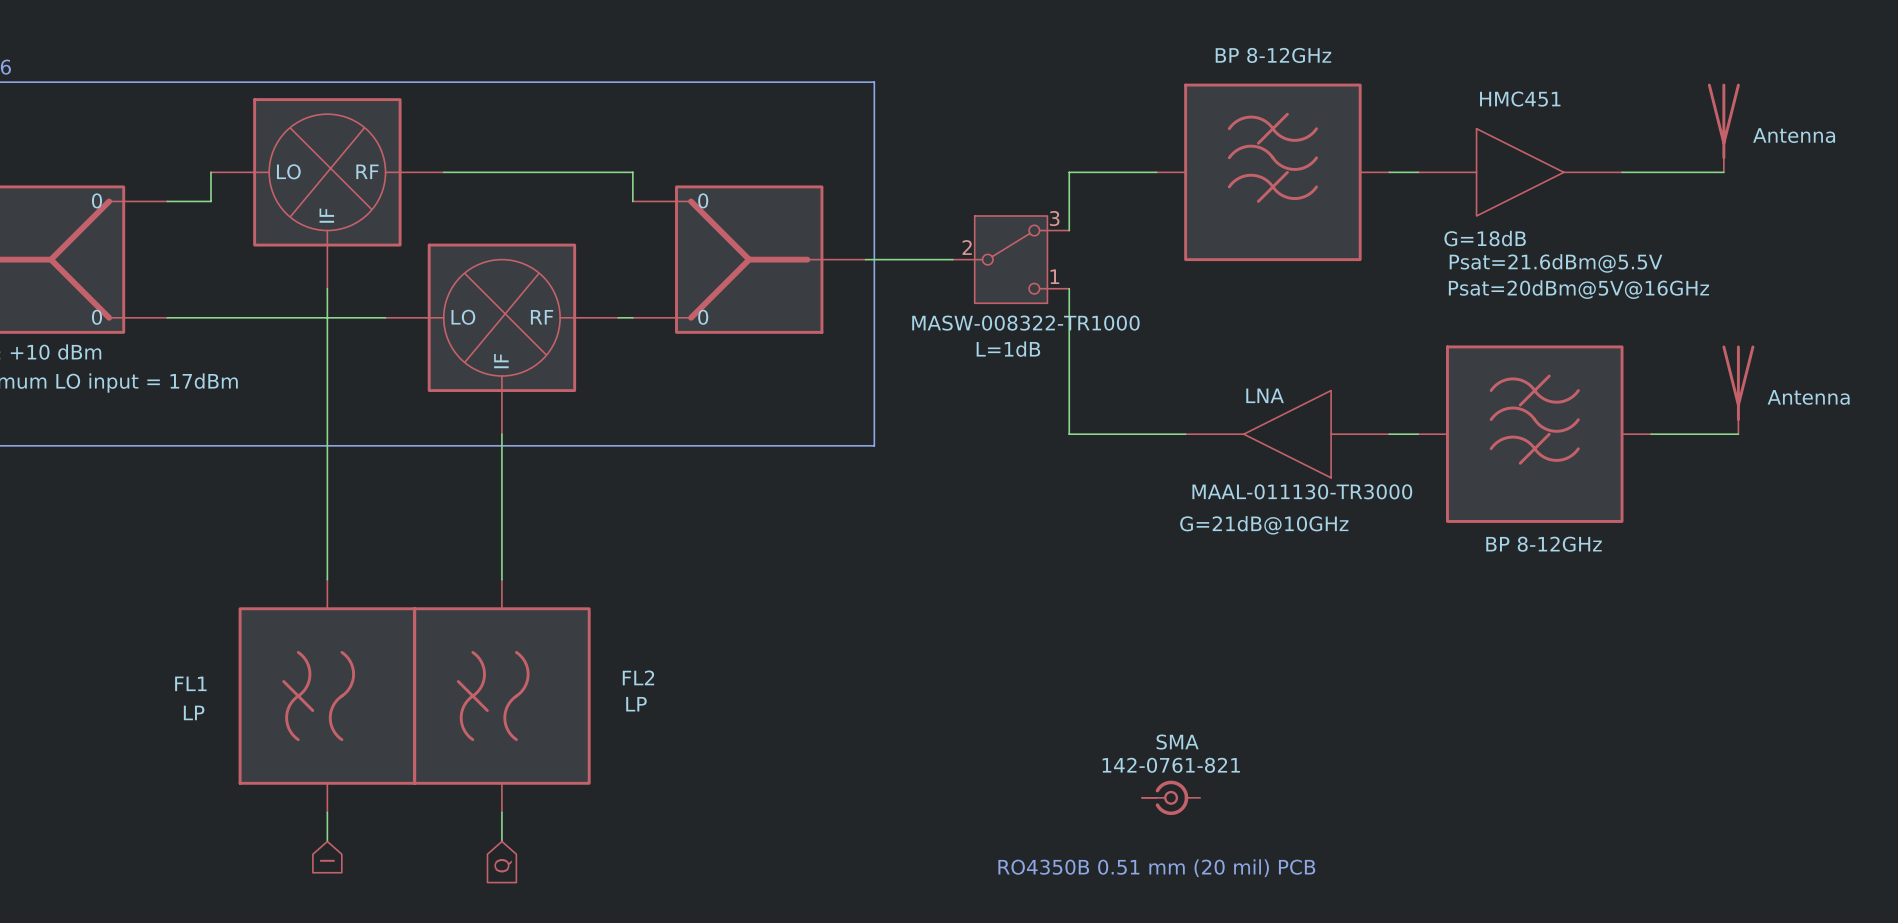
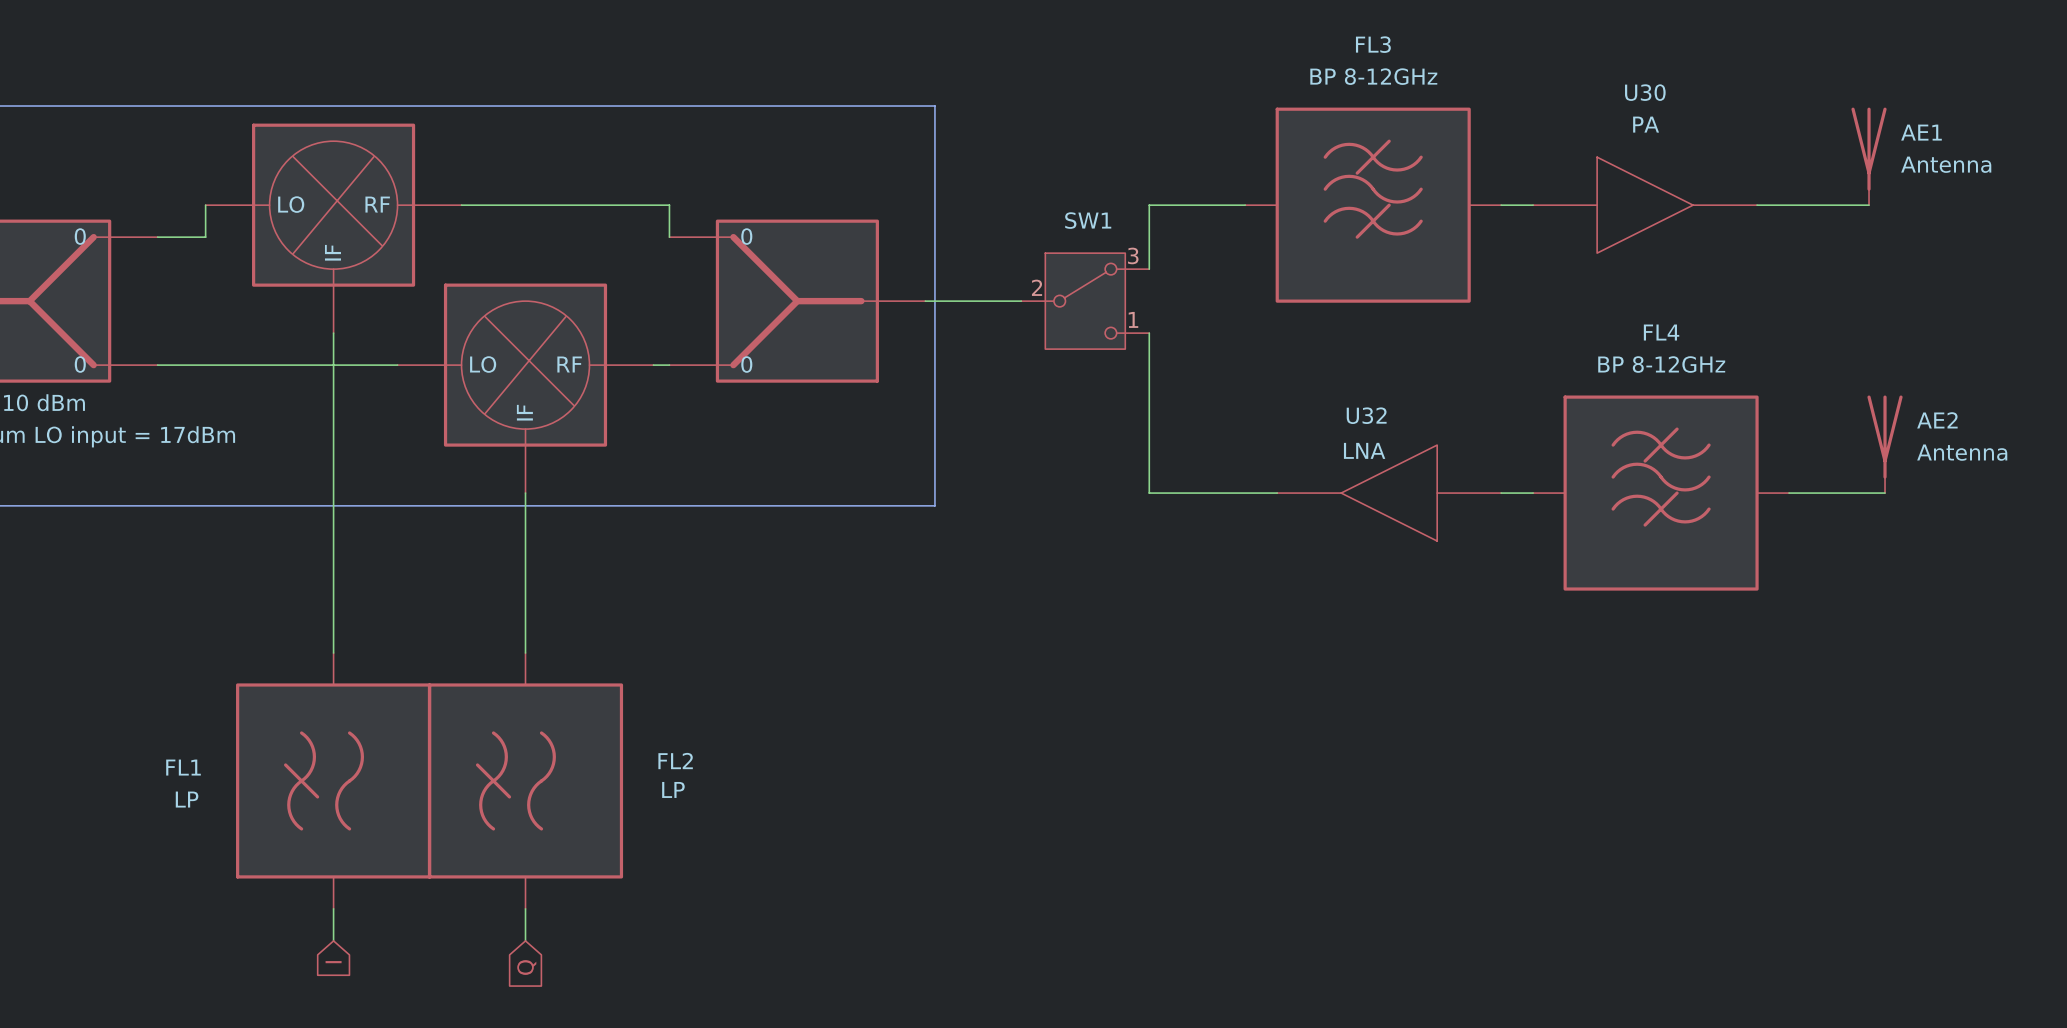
FL3 name: none -> FL3 (1373, 44)
U30 name: none -> U30 (1645, 92)
U30 value: HMC451 (1520, 99) -> PA (1646, 124)
AE1 name: none -> AE1 (1921, 132)
SW1 name: none -> SW1 (1088, 220)
U30 text: G=18dB (1485, 238) -> none
U30 text: Psat=21.6dBm@5.5V (1556, 263) -> none
FL4 name: none -> FL4 (1661, 332)
U30 text: Psat=20dBm@5V@16GHz (1578, 289) -> none
SW1 text: MASW-008322-TR1000 (1025, 323) -> none
SW1 text: L=1dB (1008, 349) -> none
U32 name: none -> U32 (1366, 415)
AE2 name: none -> AE2 (1937, 420)
U32 text: MAAL-011130-TR3000 (1302, 491) -> none
U32 text: G=21dB@10GHz (1264, 525) -> none
FL4 value position: BP 8-12GHz (1544, 544) -> BP 8-12GHz (1661, 364)
part: 142-0761-821 (1171, 797) -> none
text: RO4350B 0.51 mm (20 mil) PCB (1156, 868) -> none

